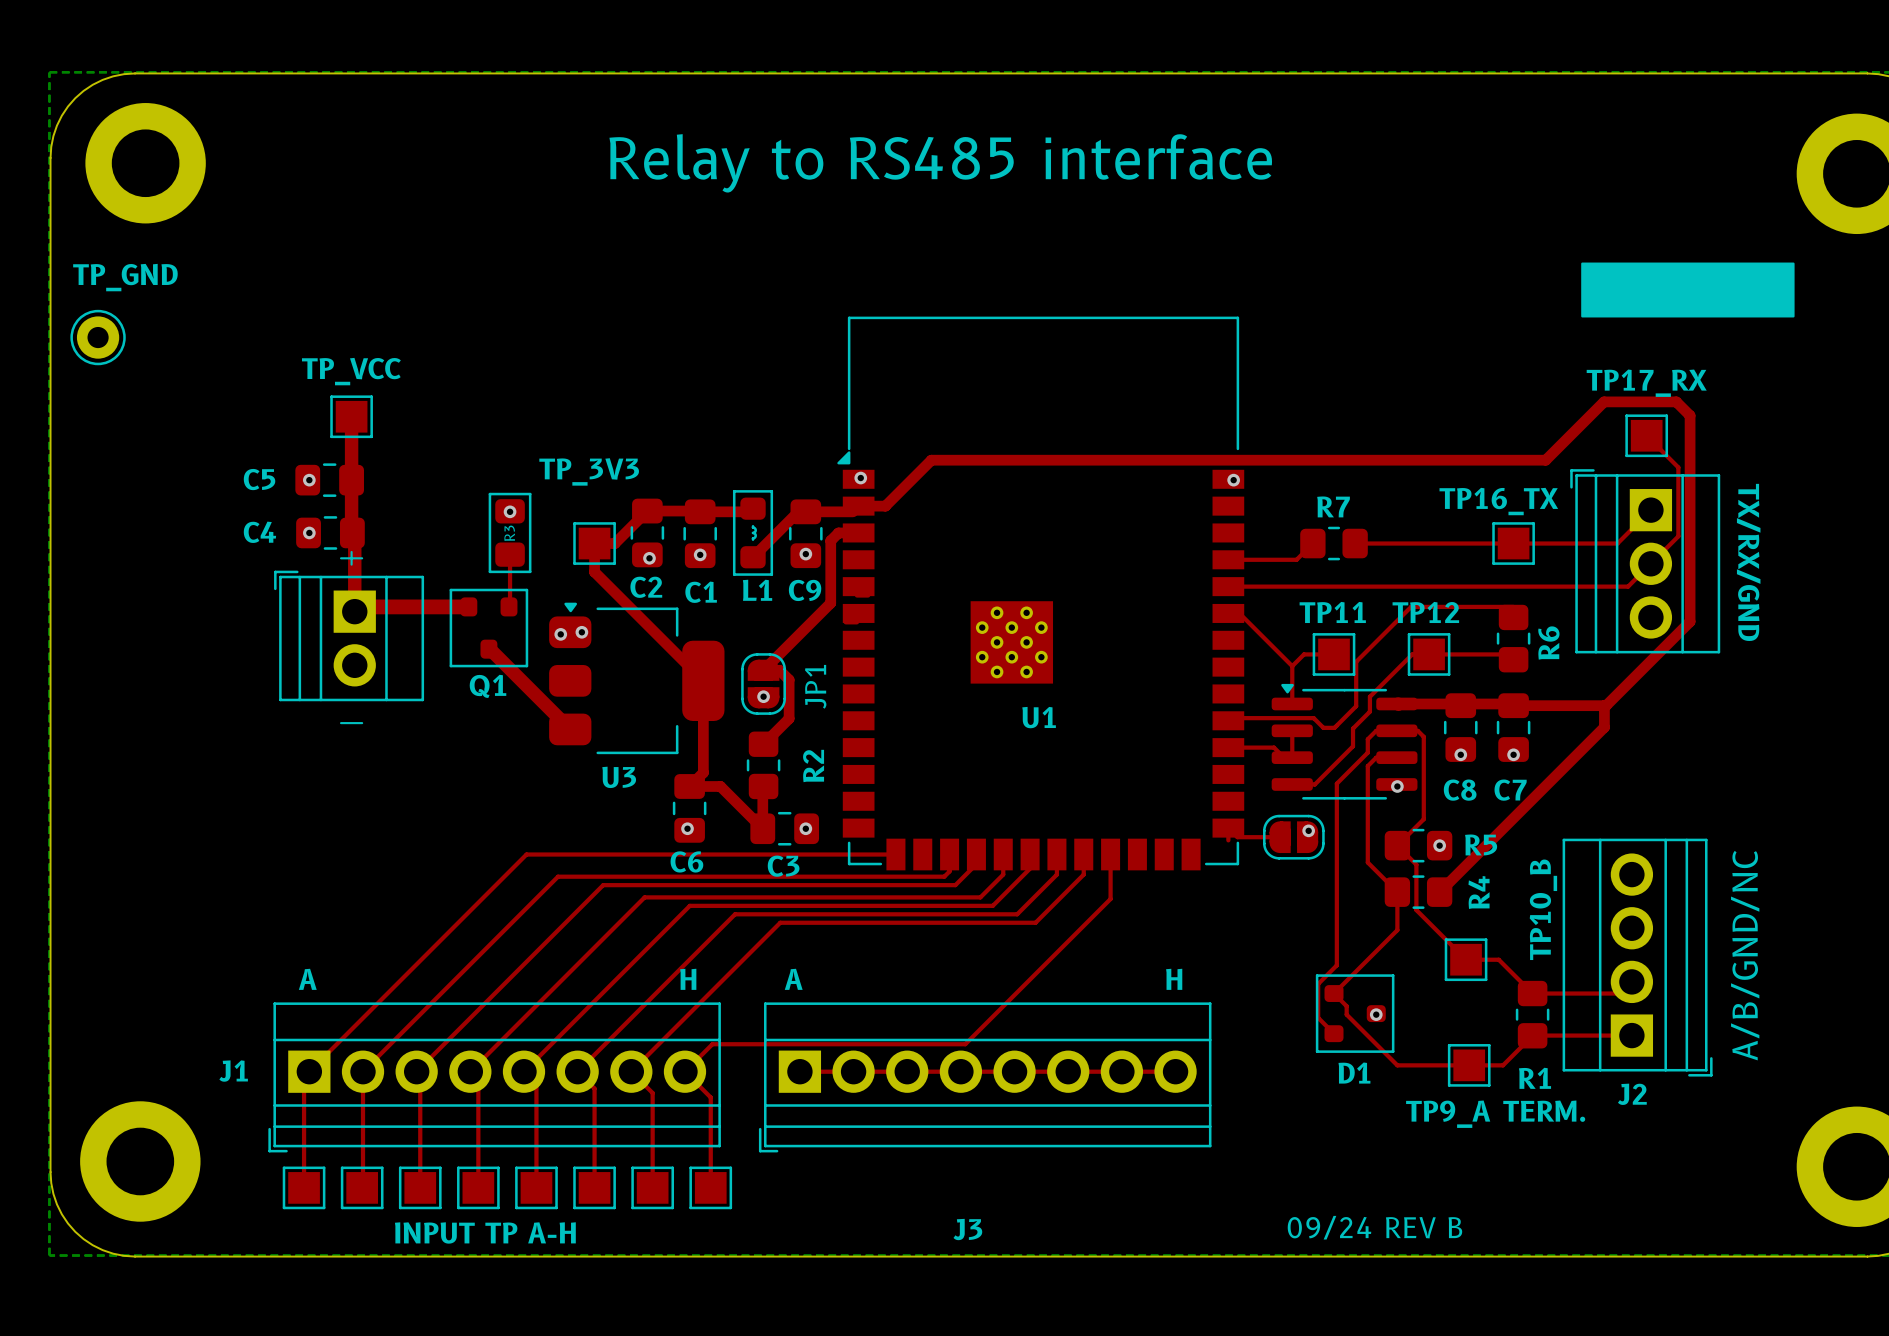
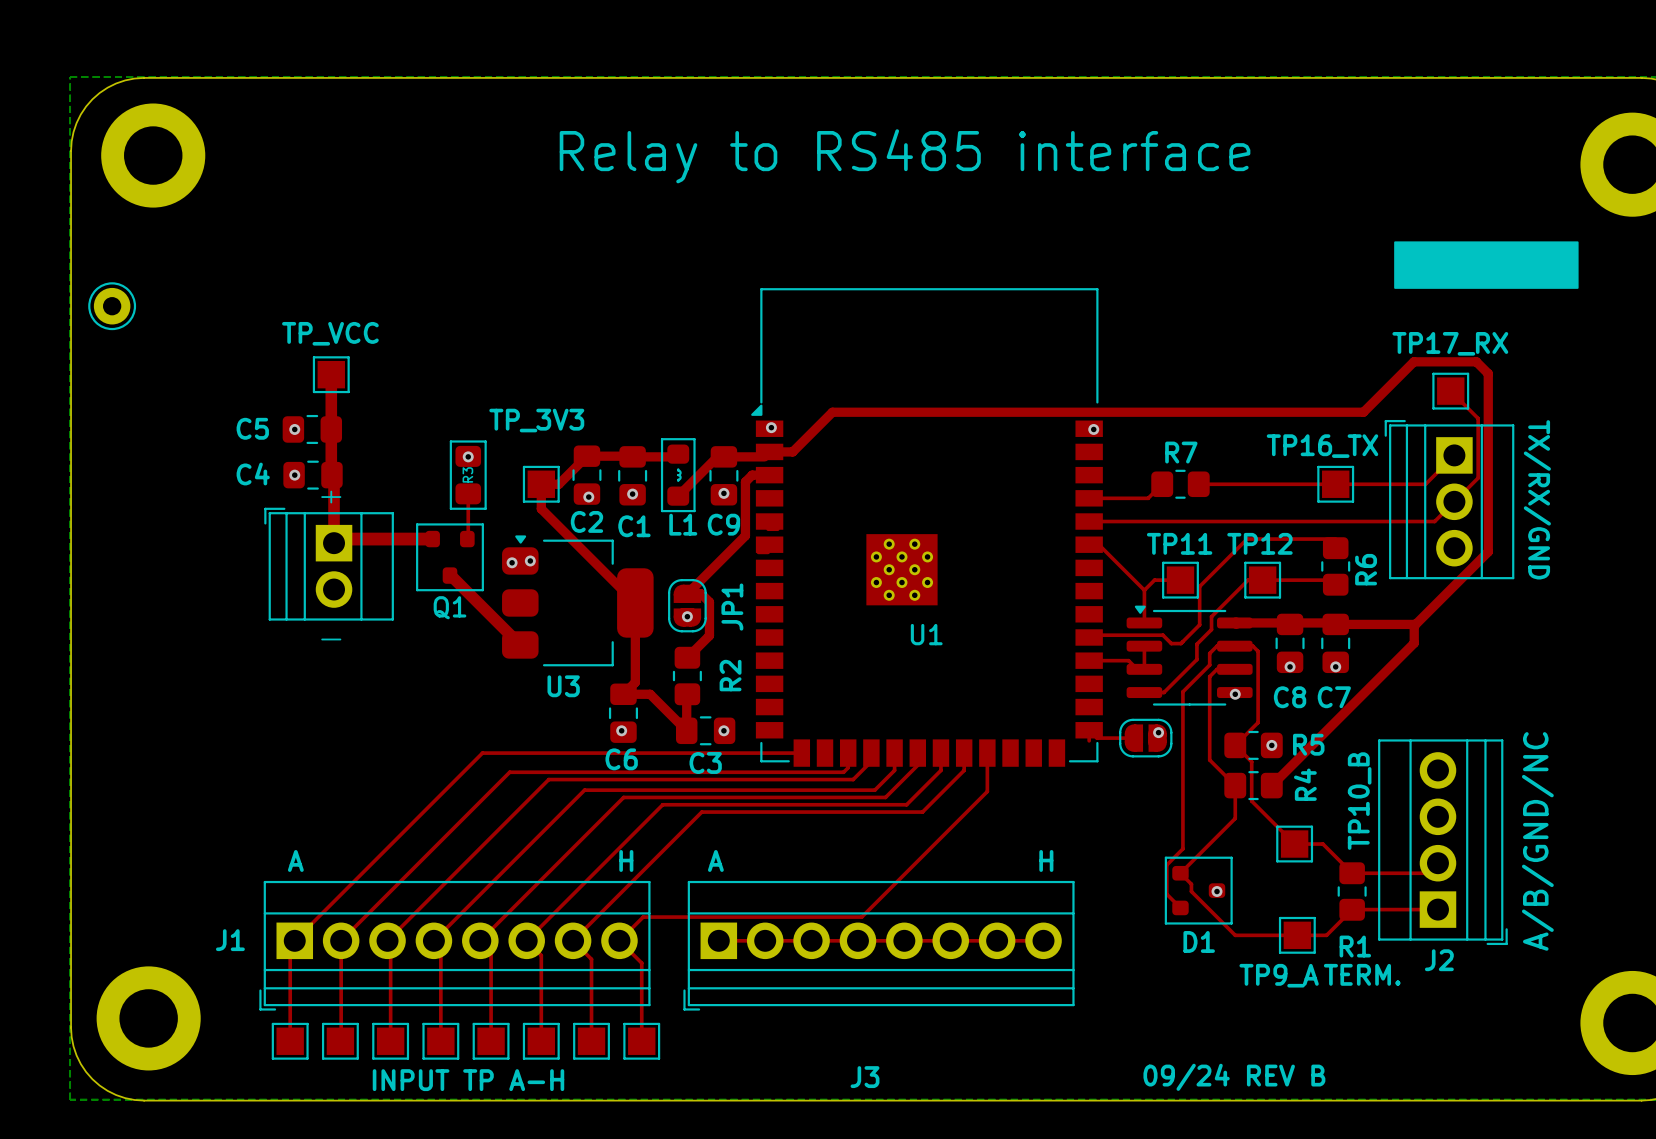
text: TP_GND (125, 277) -> none

